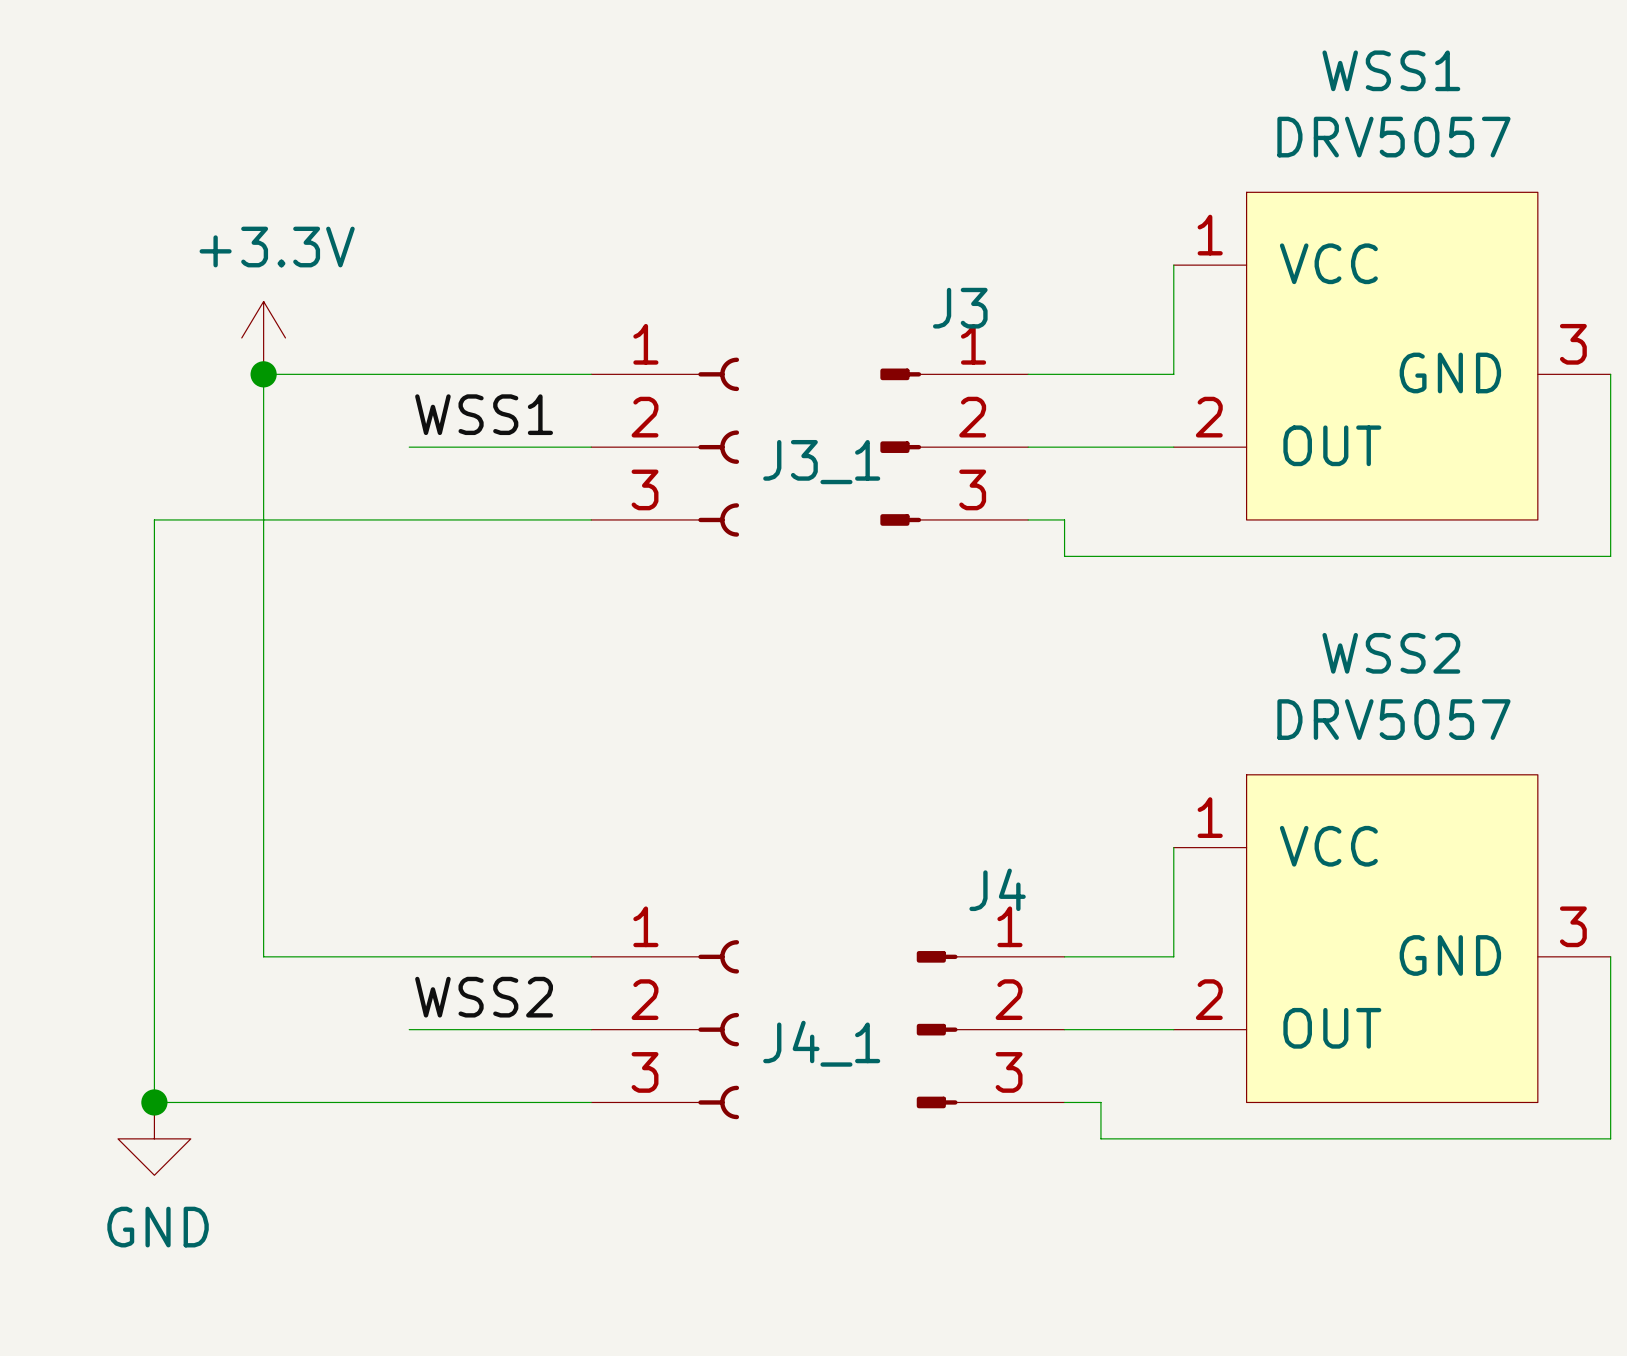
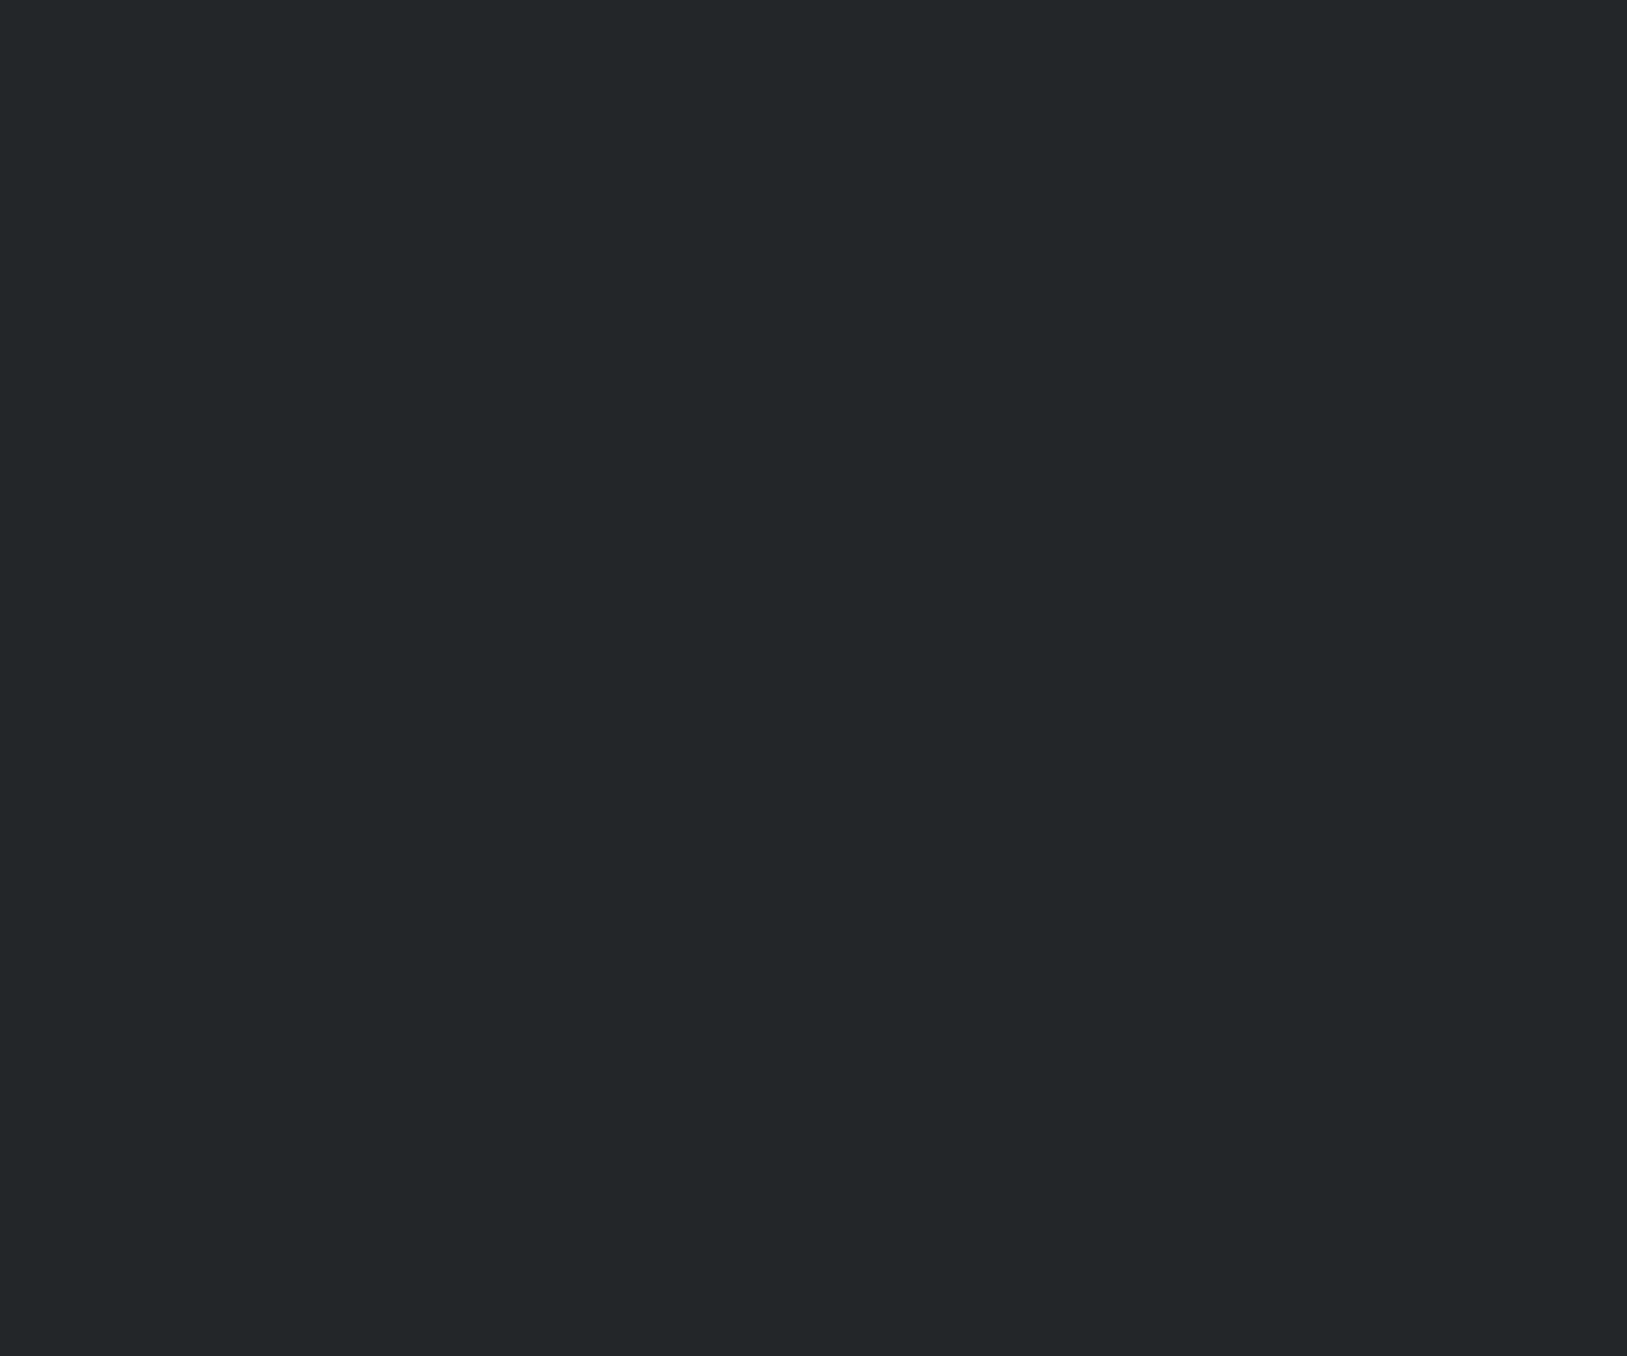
wire: (1173, 265) (1173, 374) (1028, 374) -> none
power symbol: +3.3V (263, 337) -> none
WSS1: DRV5057 (1392, 356) -> none
junction: (263, 374) -> none
wire: (591, 374) (263, 374) (263, 956) (591, 956) -> none
wire: (1610, 374) (1610, 556) (1064, 556) (1064, 519) (1028, 519) -> none
label: WSS1 (484, 414) -> none
wire: (409, 447) (591, 447) -> none
J3_1: (665, 447) -> none
J3: (954, 447) -> none
wire: (1028, 447) (1173, 447) -> none
wire: (591, 519) (154, 519) (154, 1102) (591, 1102) -> none
wire: (1173, 847) (1173, 956) (1064, 956) -> none
WSS2: DRV5057 (1392, 938) -> none
wire: (1610, 956) (1610, 1138) (1100, 1138) (1100, 1102) (1064, 1102) -> none
label: WSS2 (484, 997) -> none
wire: (409, 1029) (591, 1029) -> none
J4_1: (665, 1029) -> none
J4: (990, 1029) -> none
wire: (1064, 1029) (1173, 1029) -> none
junction: (154, 1102) -> none
power symbol: GND (154, 1138) -> none

